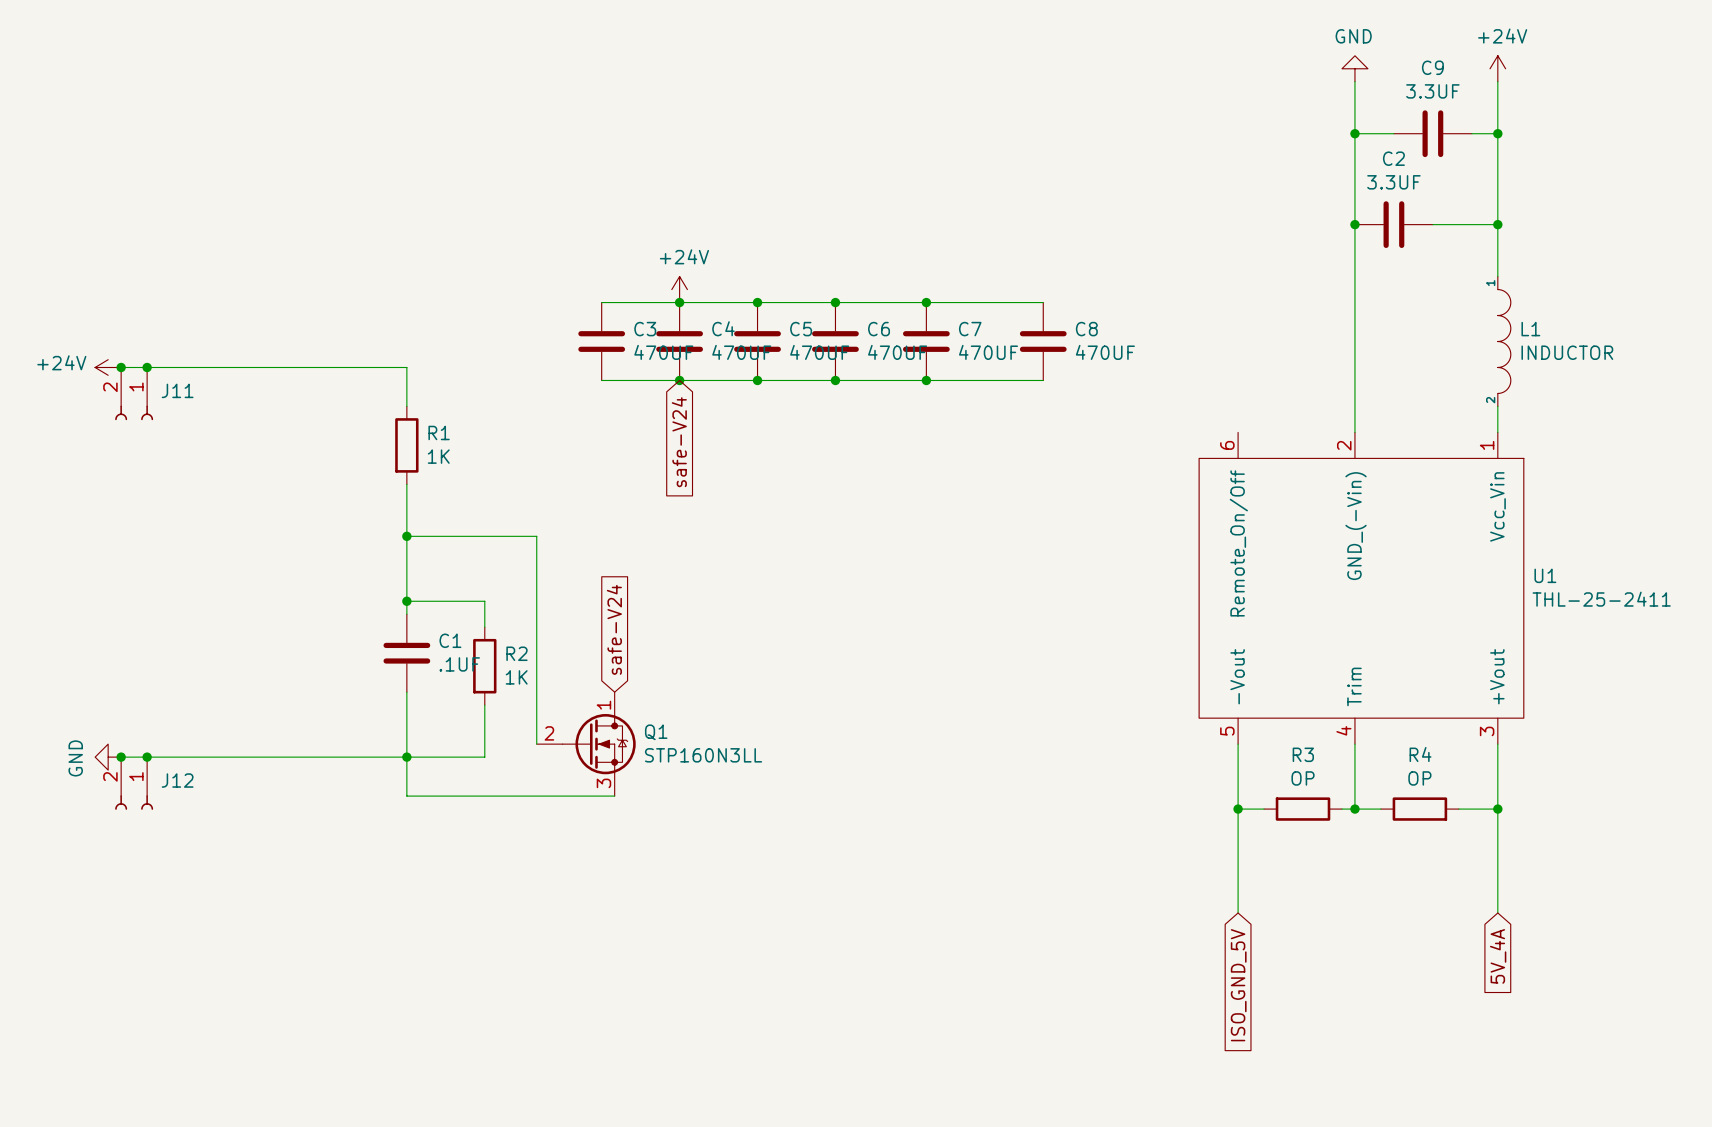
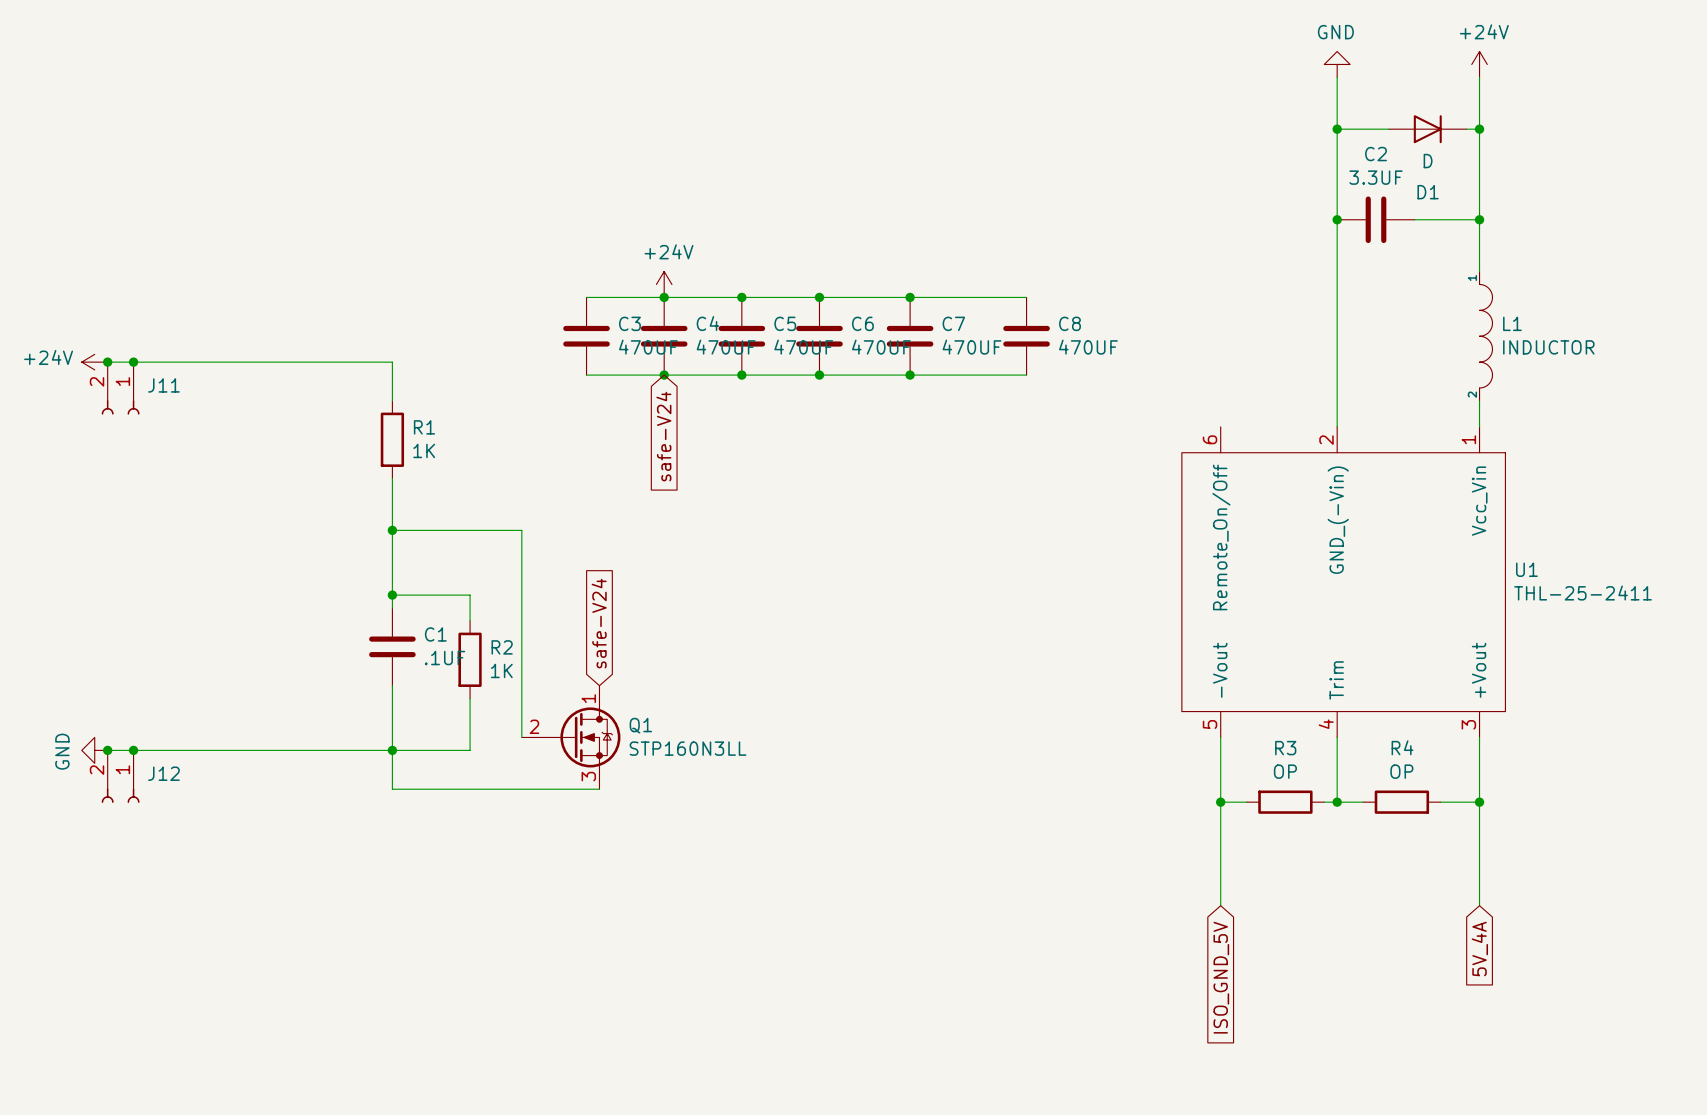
C9: 3.3UF (1432, 133) -> none
D1: none -> D (1427, 129)

